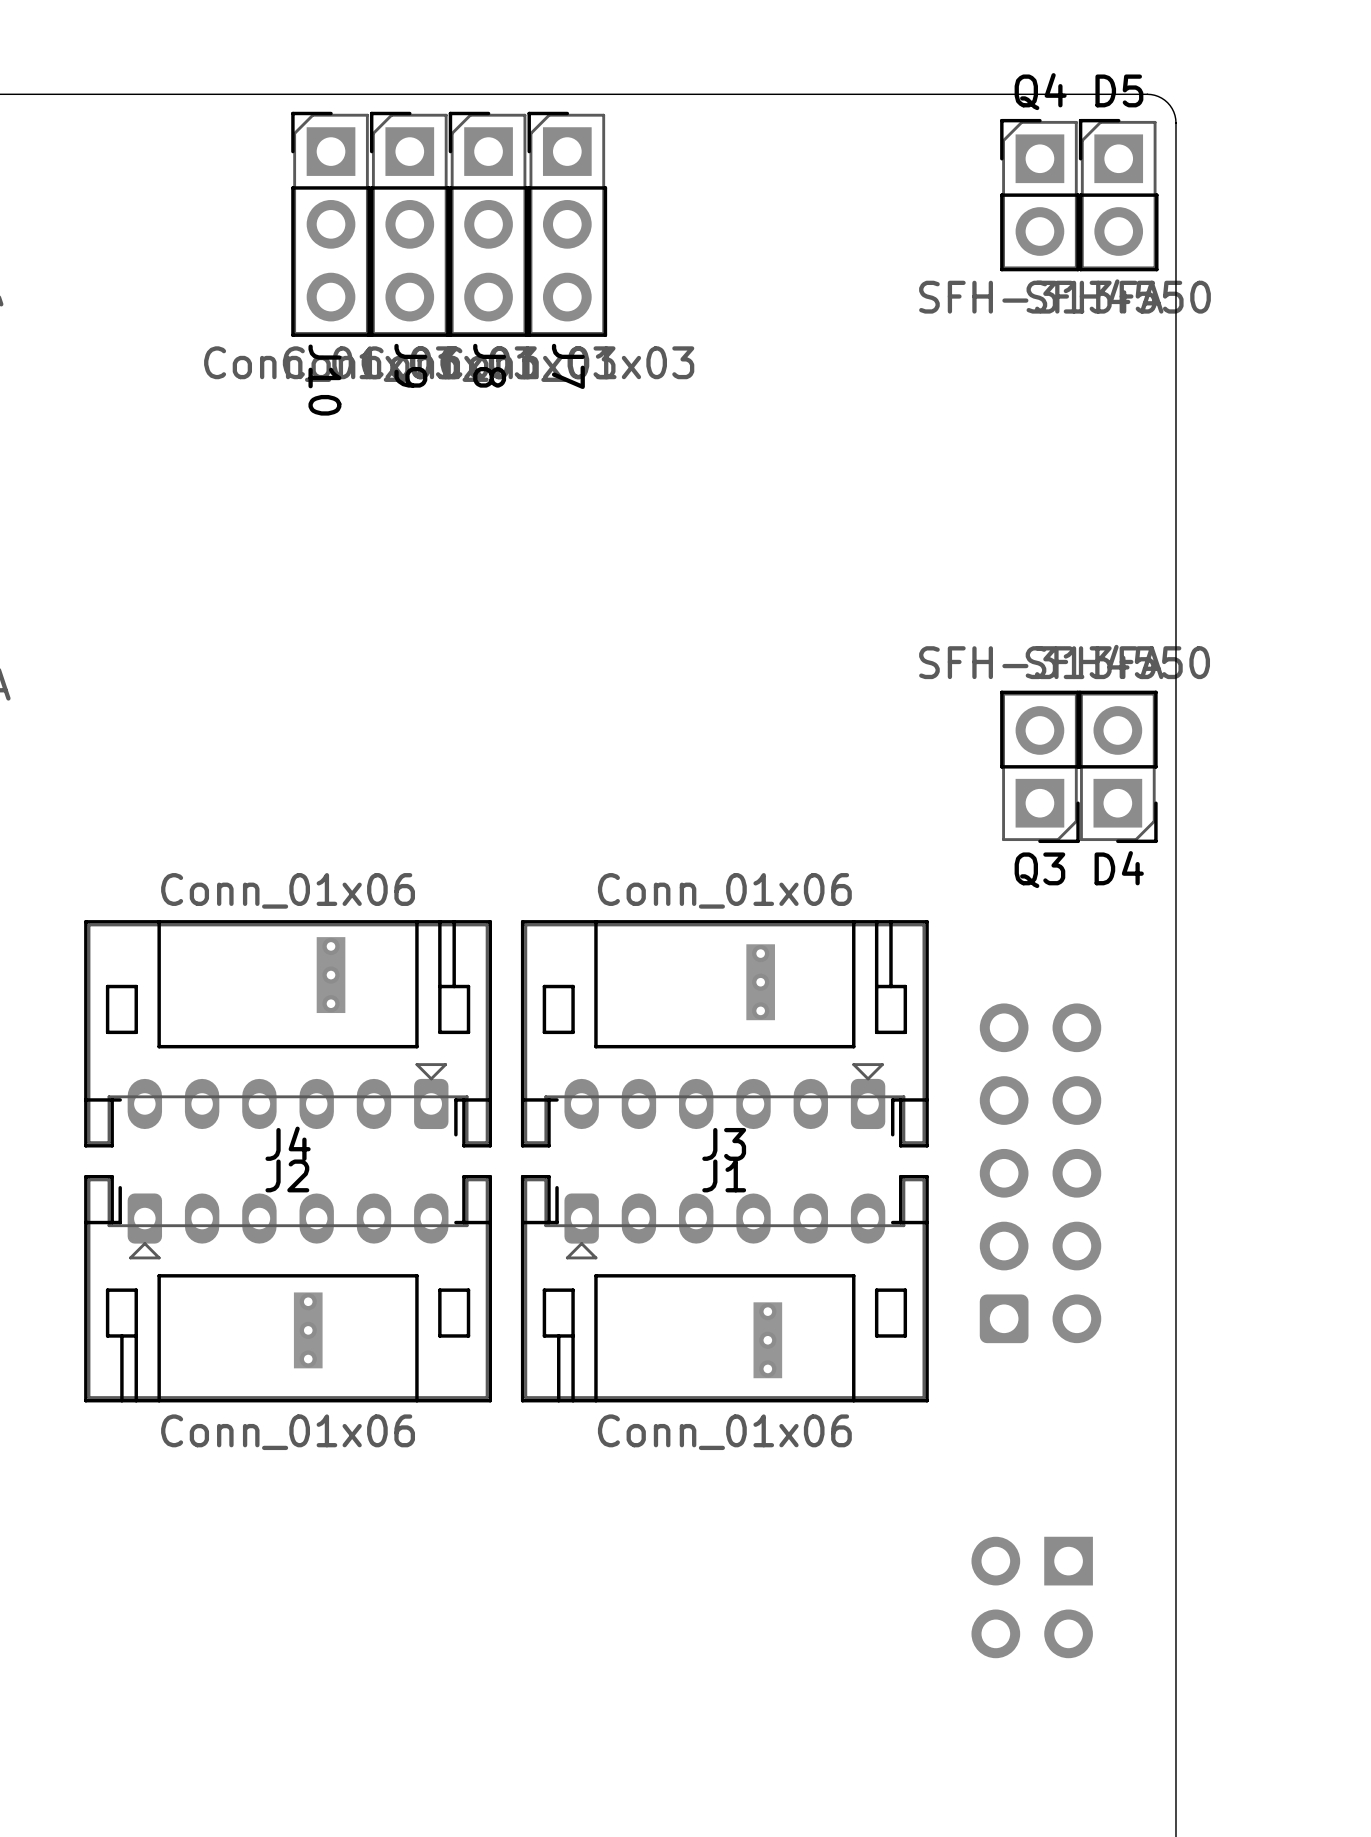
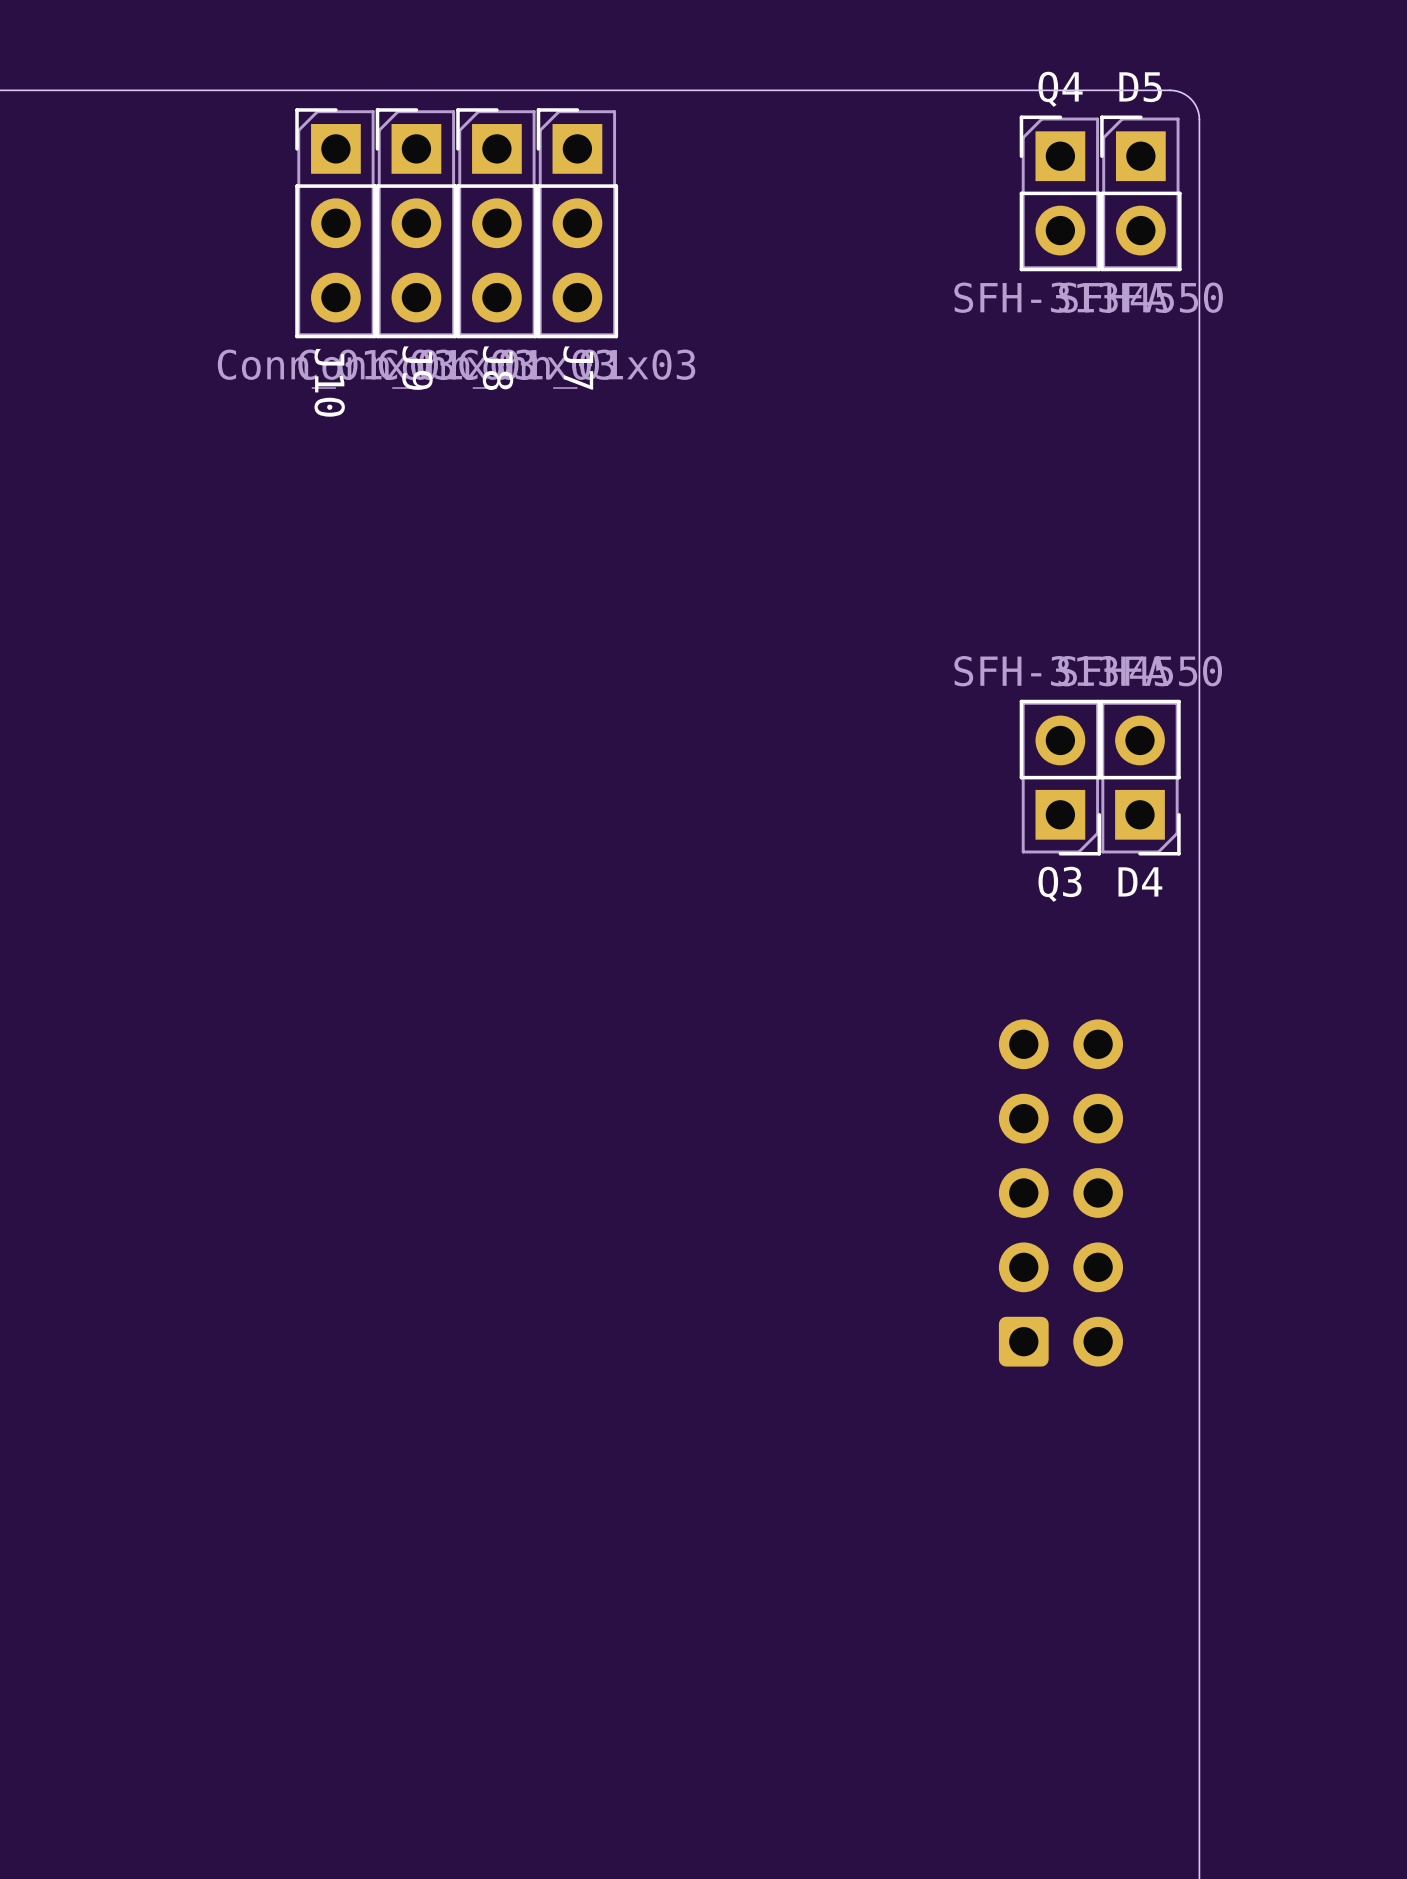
part: (331, 975) -> none
part: (760, 982) -> none
J2: Conn_01x06 (288, 1033) -> none
J1: Conn_01x06 (724, 1033) -> none
J4: Conn_01x06 (288, 1288) -> none
J3: Conn_01x06 (724, 1288) -> none
part: (308, 1330) -> none
part: (767, 1340) -> none
part: (1032, 1597) -> none

